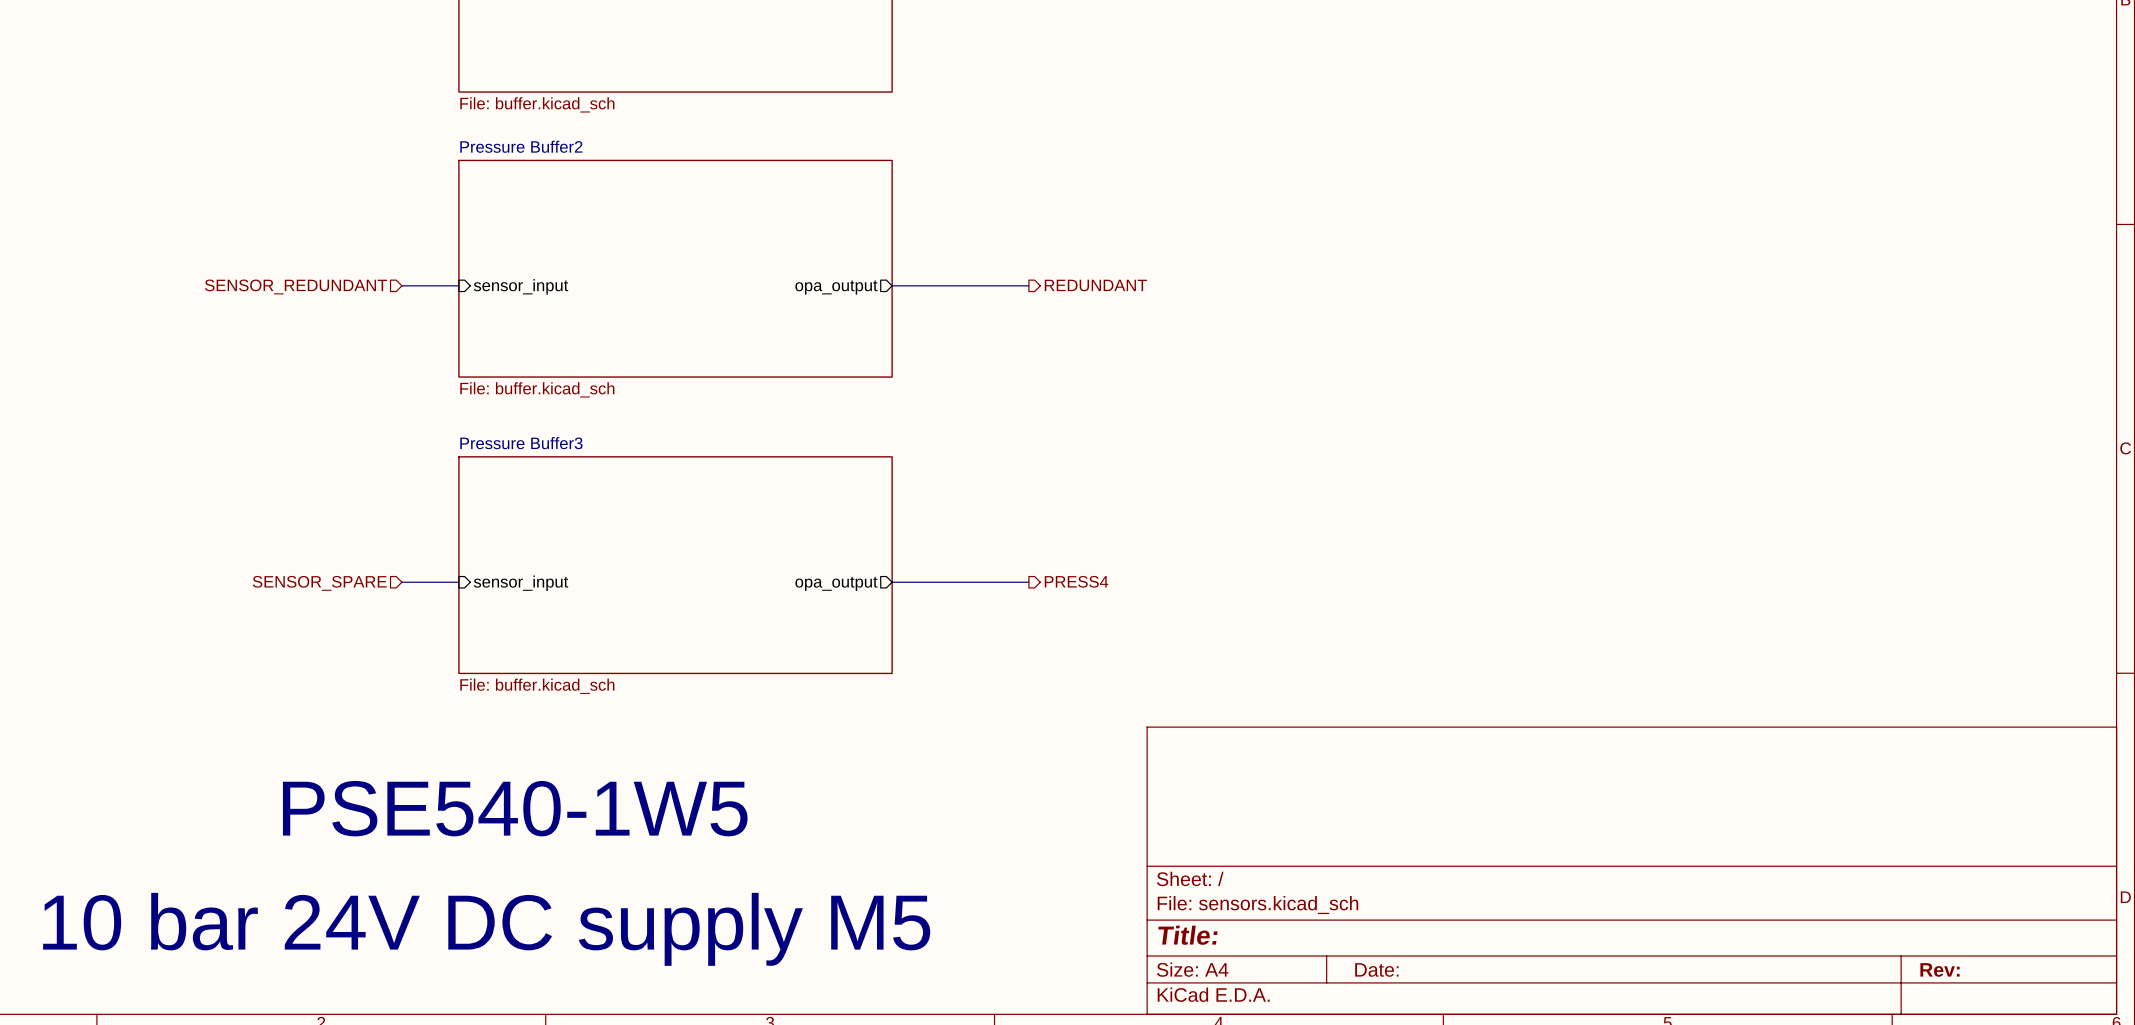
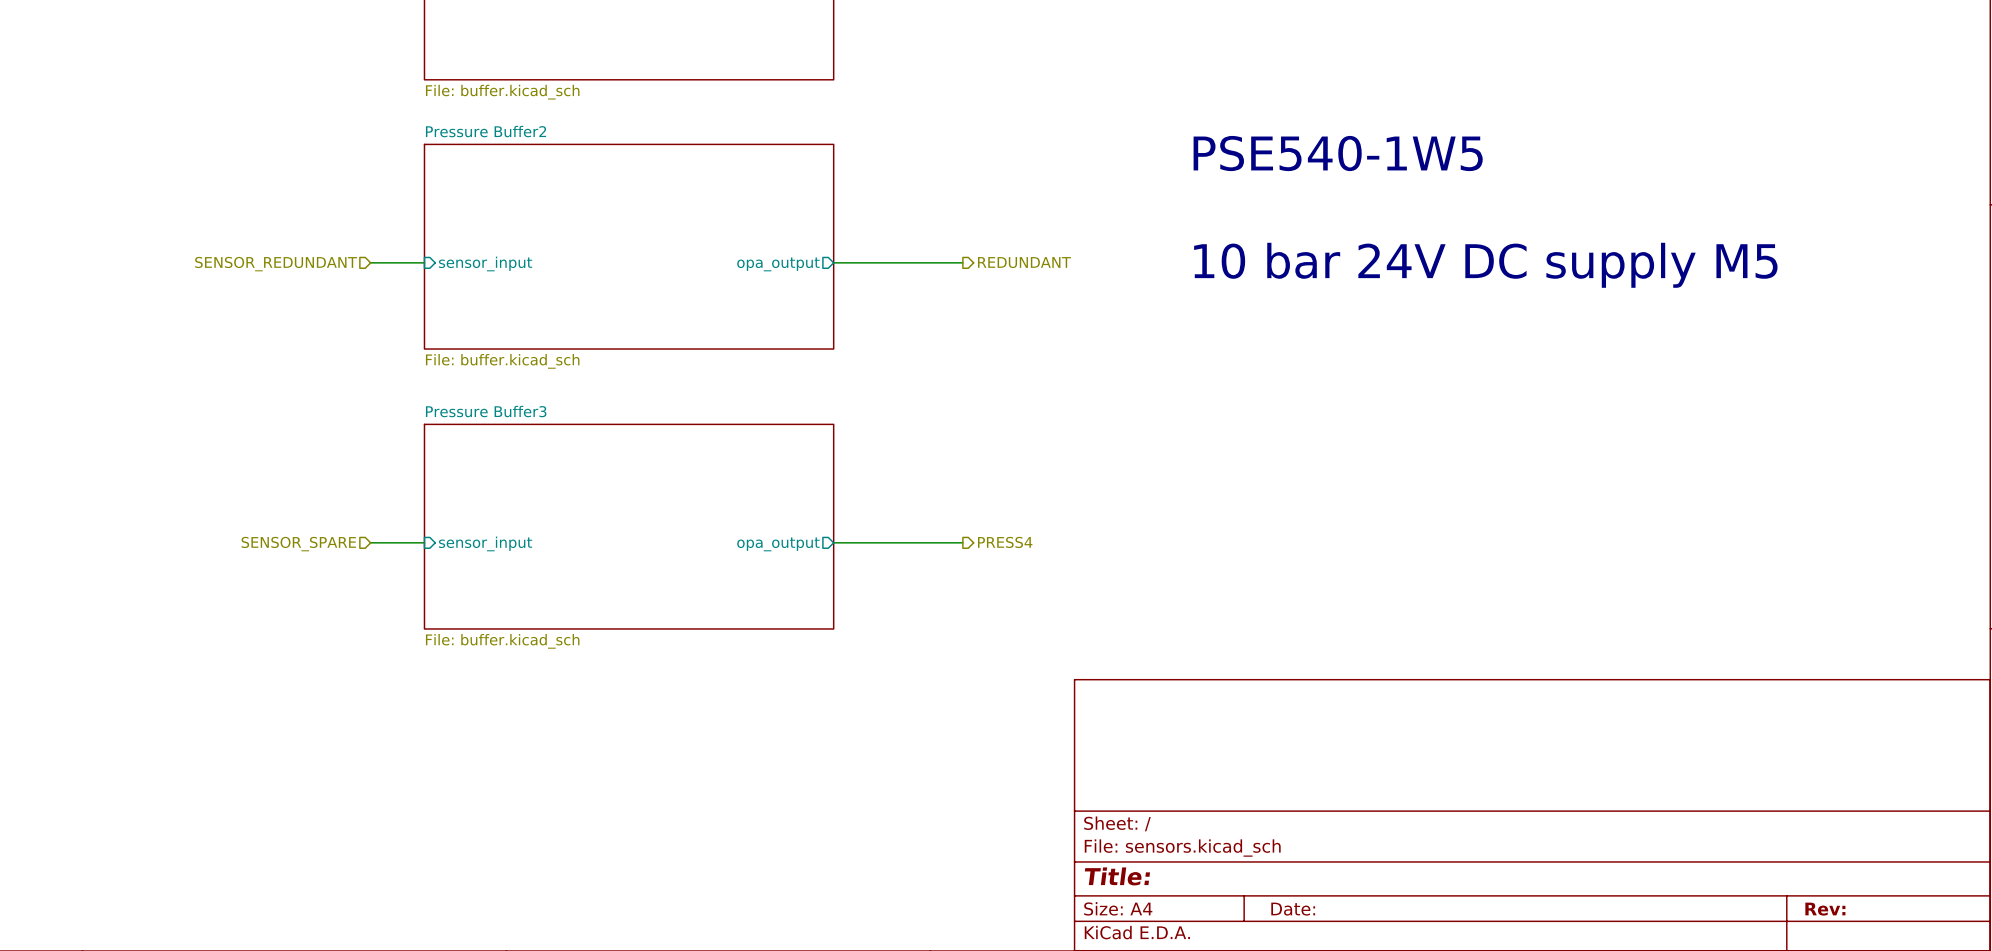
text: none -> PSE540-1W5 (1338, 153)
text: none -> 10 bar 24V DC supply M5 (1485, 265)
text: PSE540-1W5 (515, 808) -> none
text: 10 bar 24V DC supply M5 (486, 929) -> none

